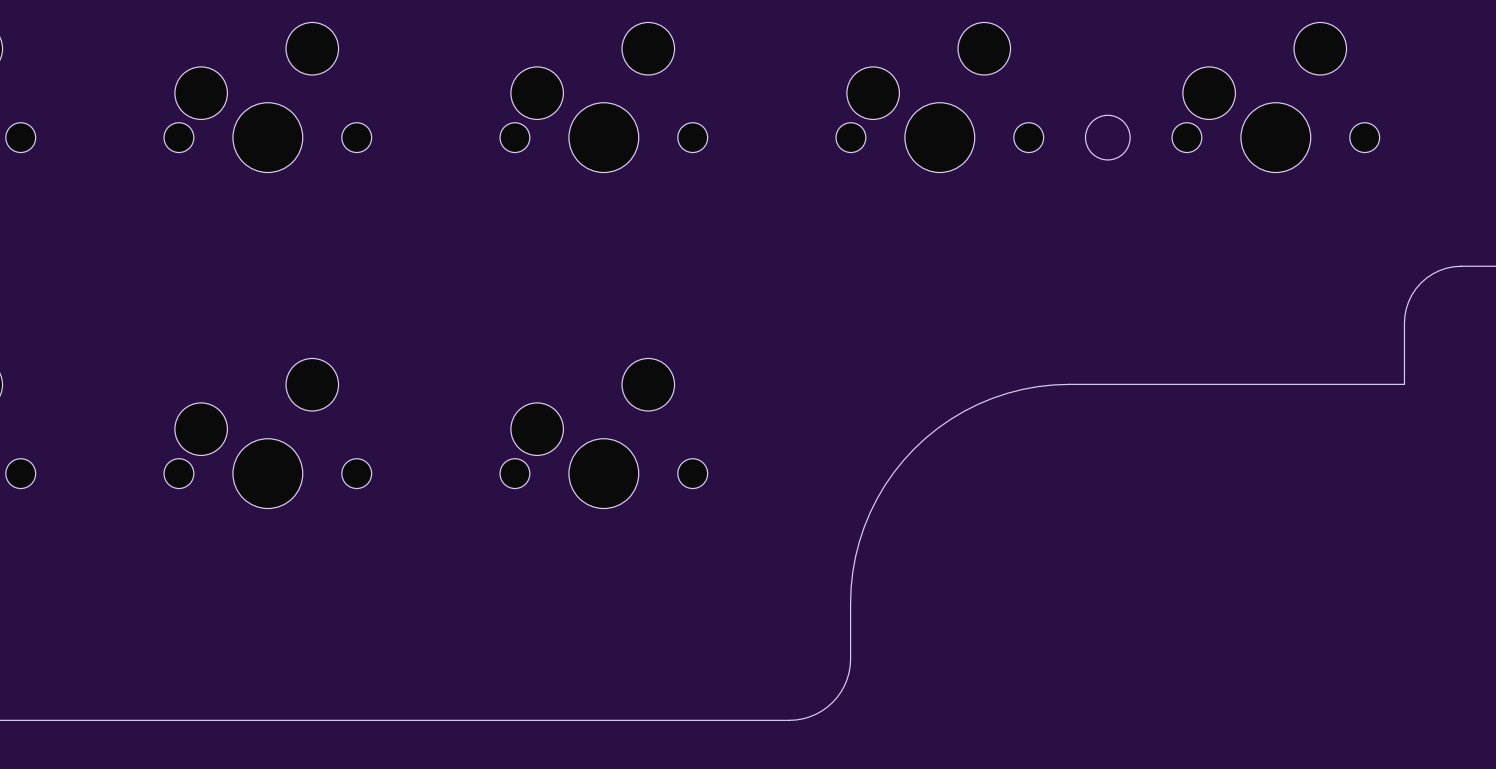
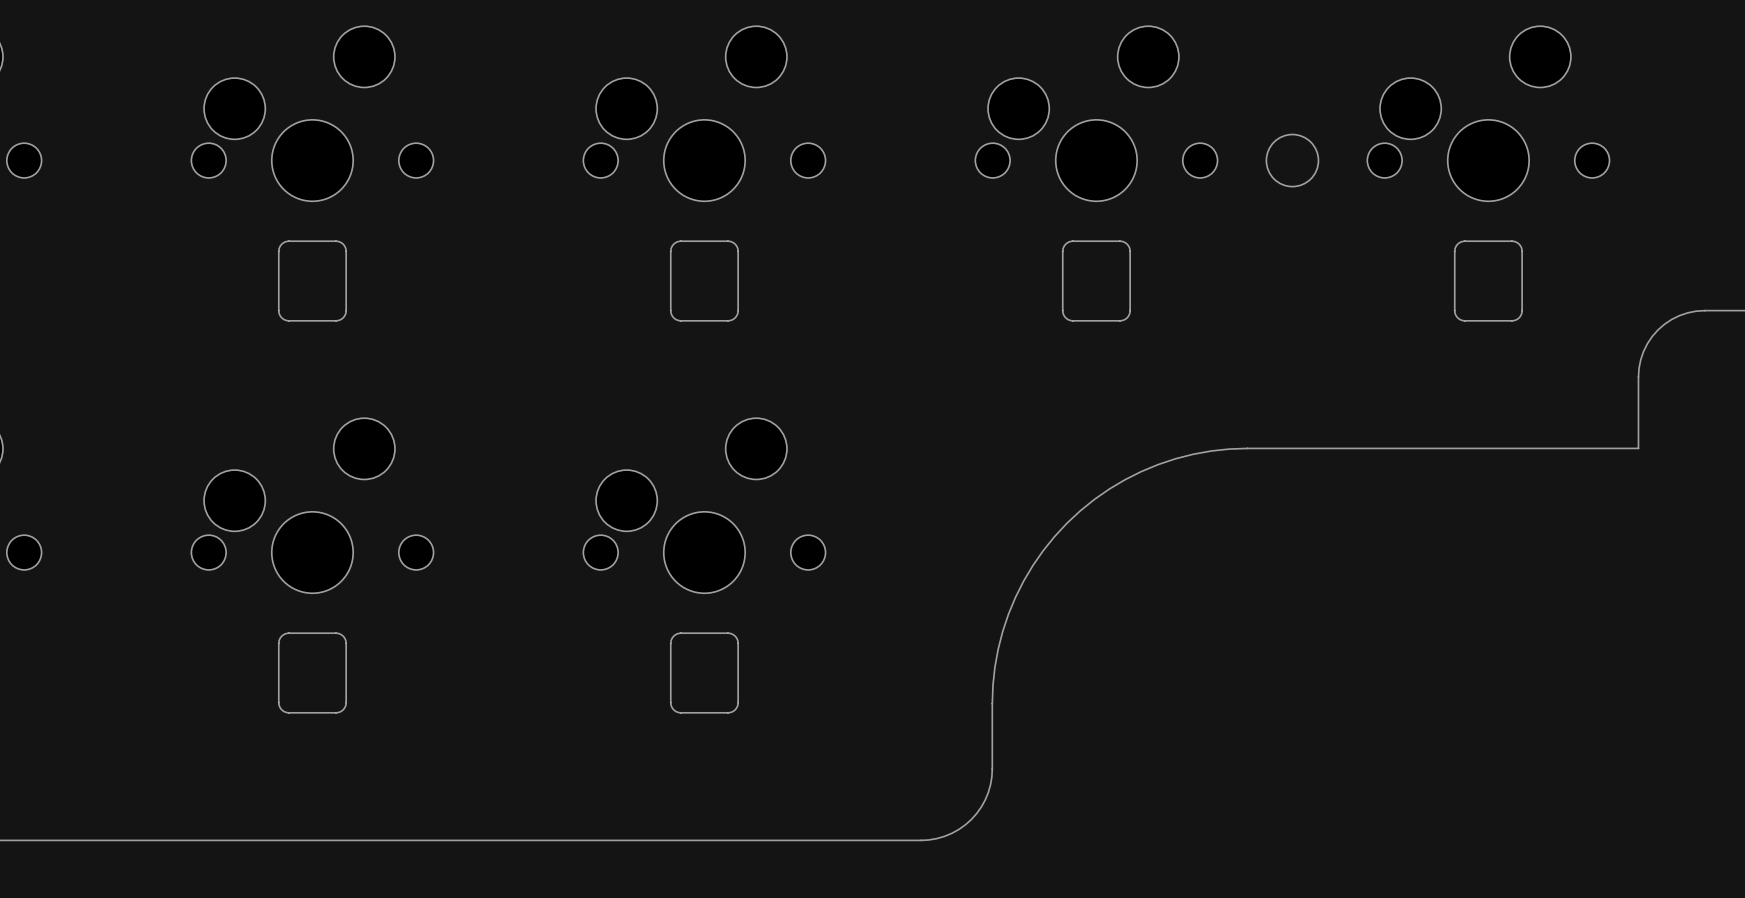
part: none -> (312, 281)
part: none -> (704, 281)
part: none -> (1096, 281)
part: none -> (1488, 281)
part: none -> (312, 673)
part: none -> (704, 673)

